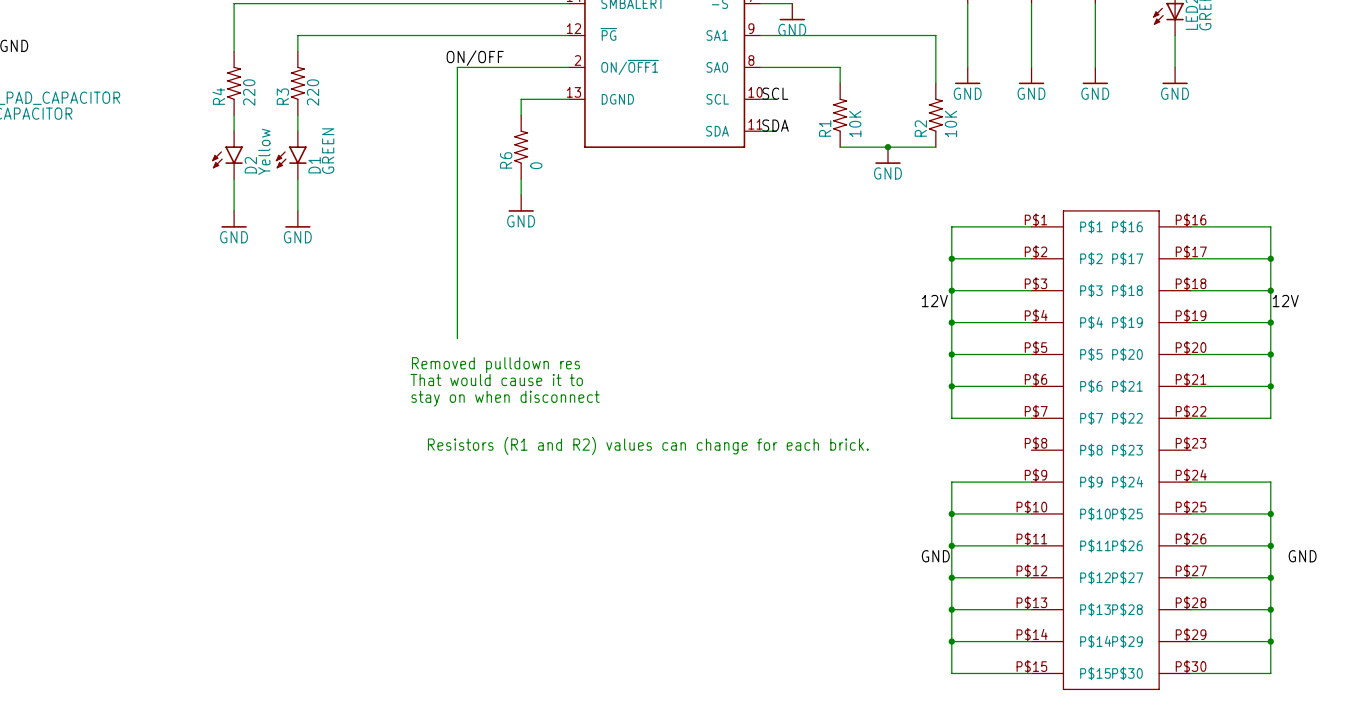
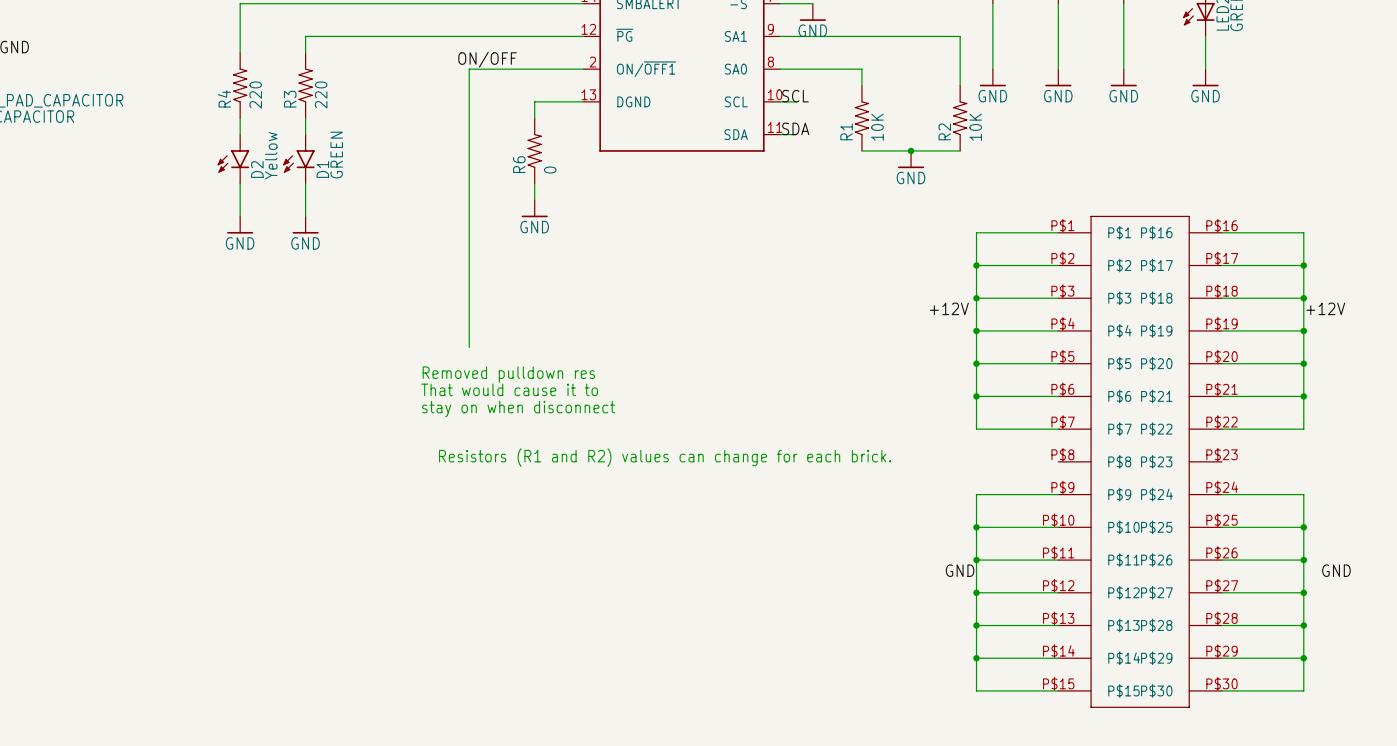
label: 12V (934, 301) -> +12V (949, 308)
label: 12V (1285, 301) -> +12V (1325, 308)

